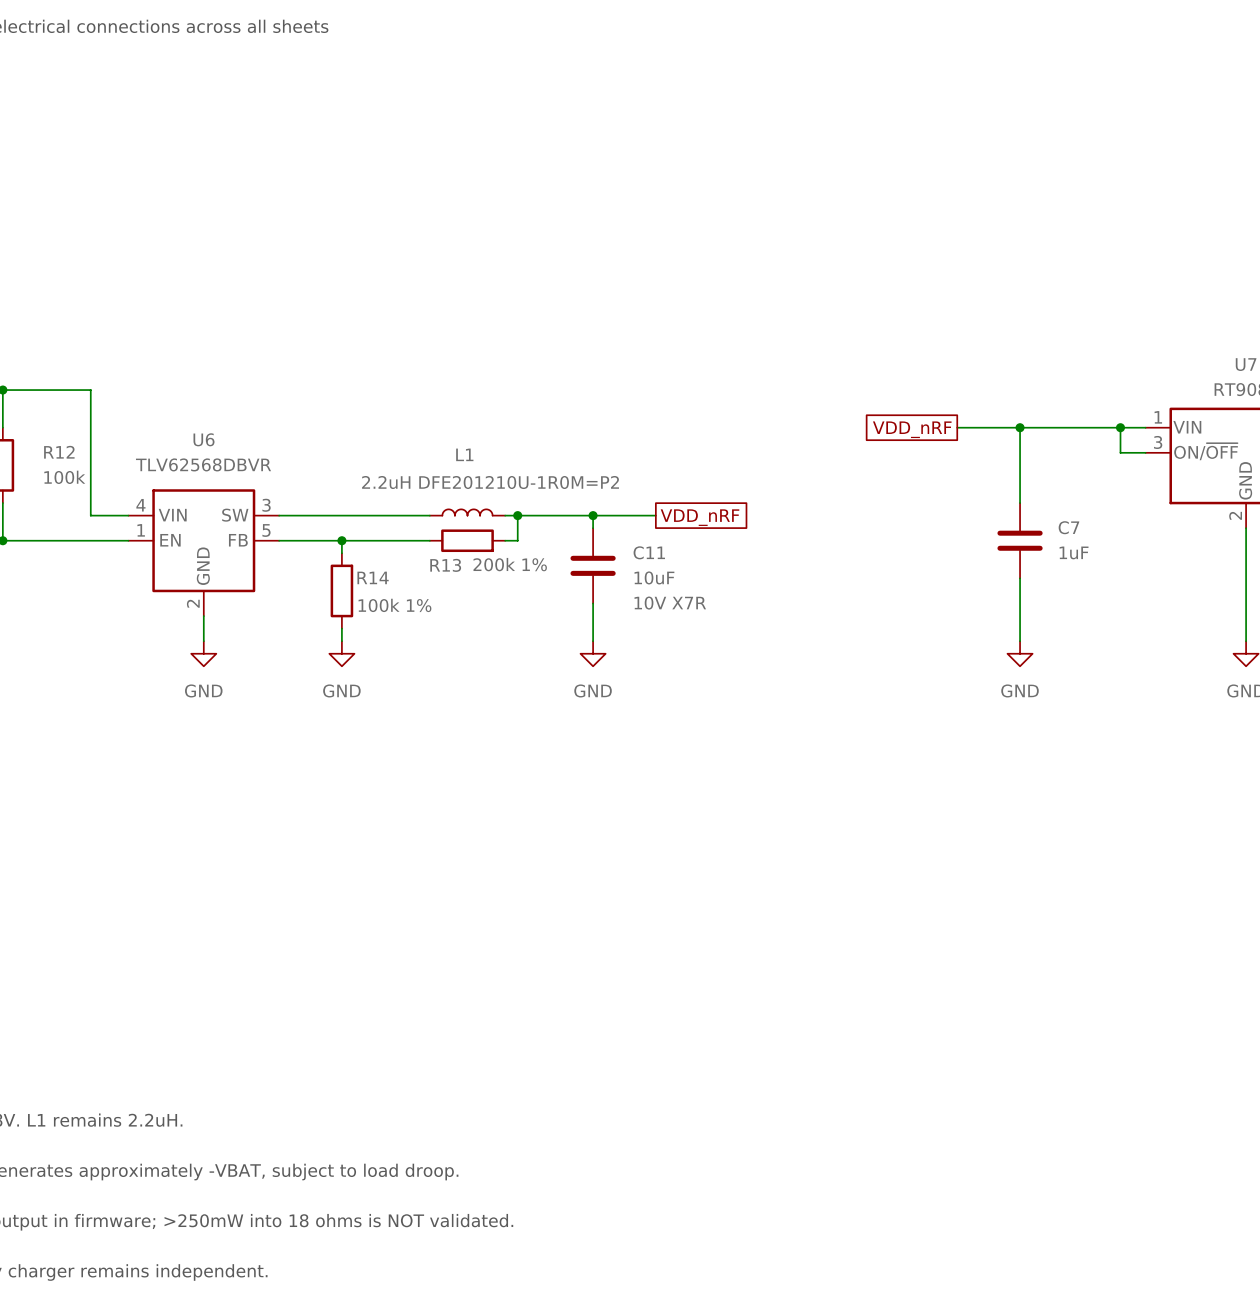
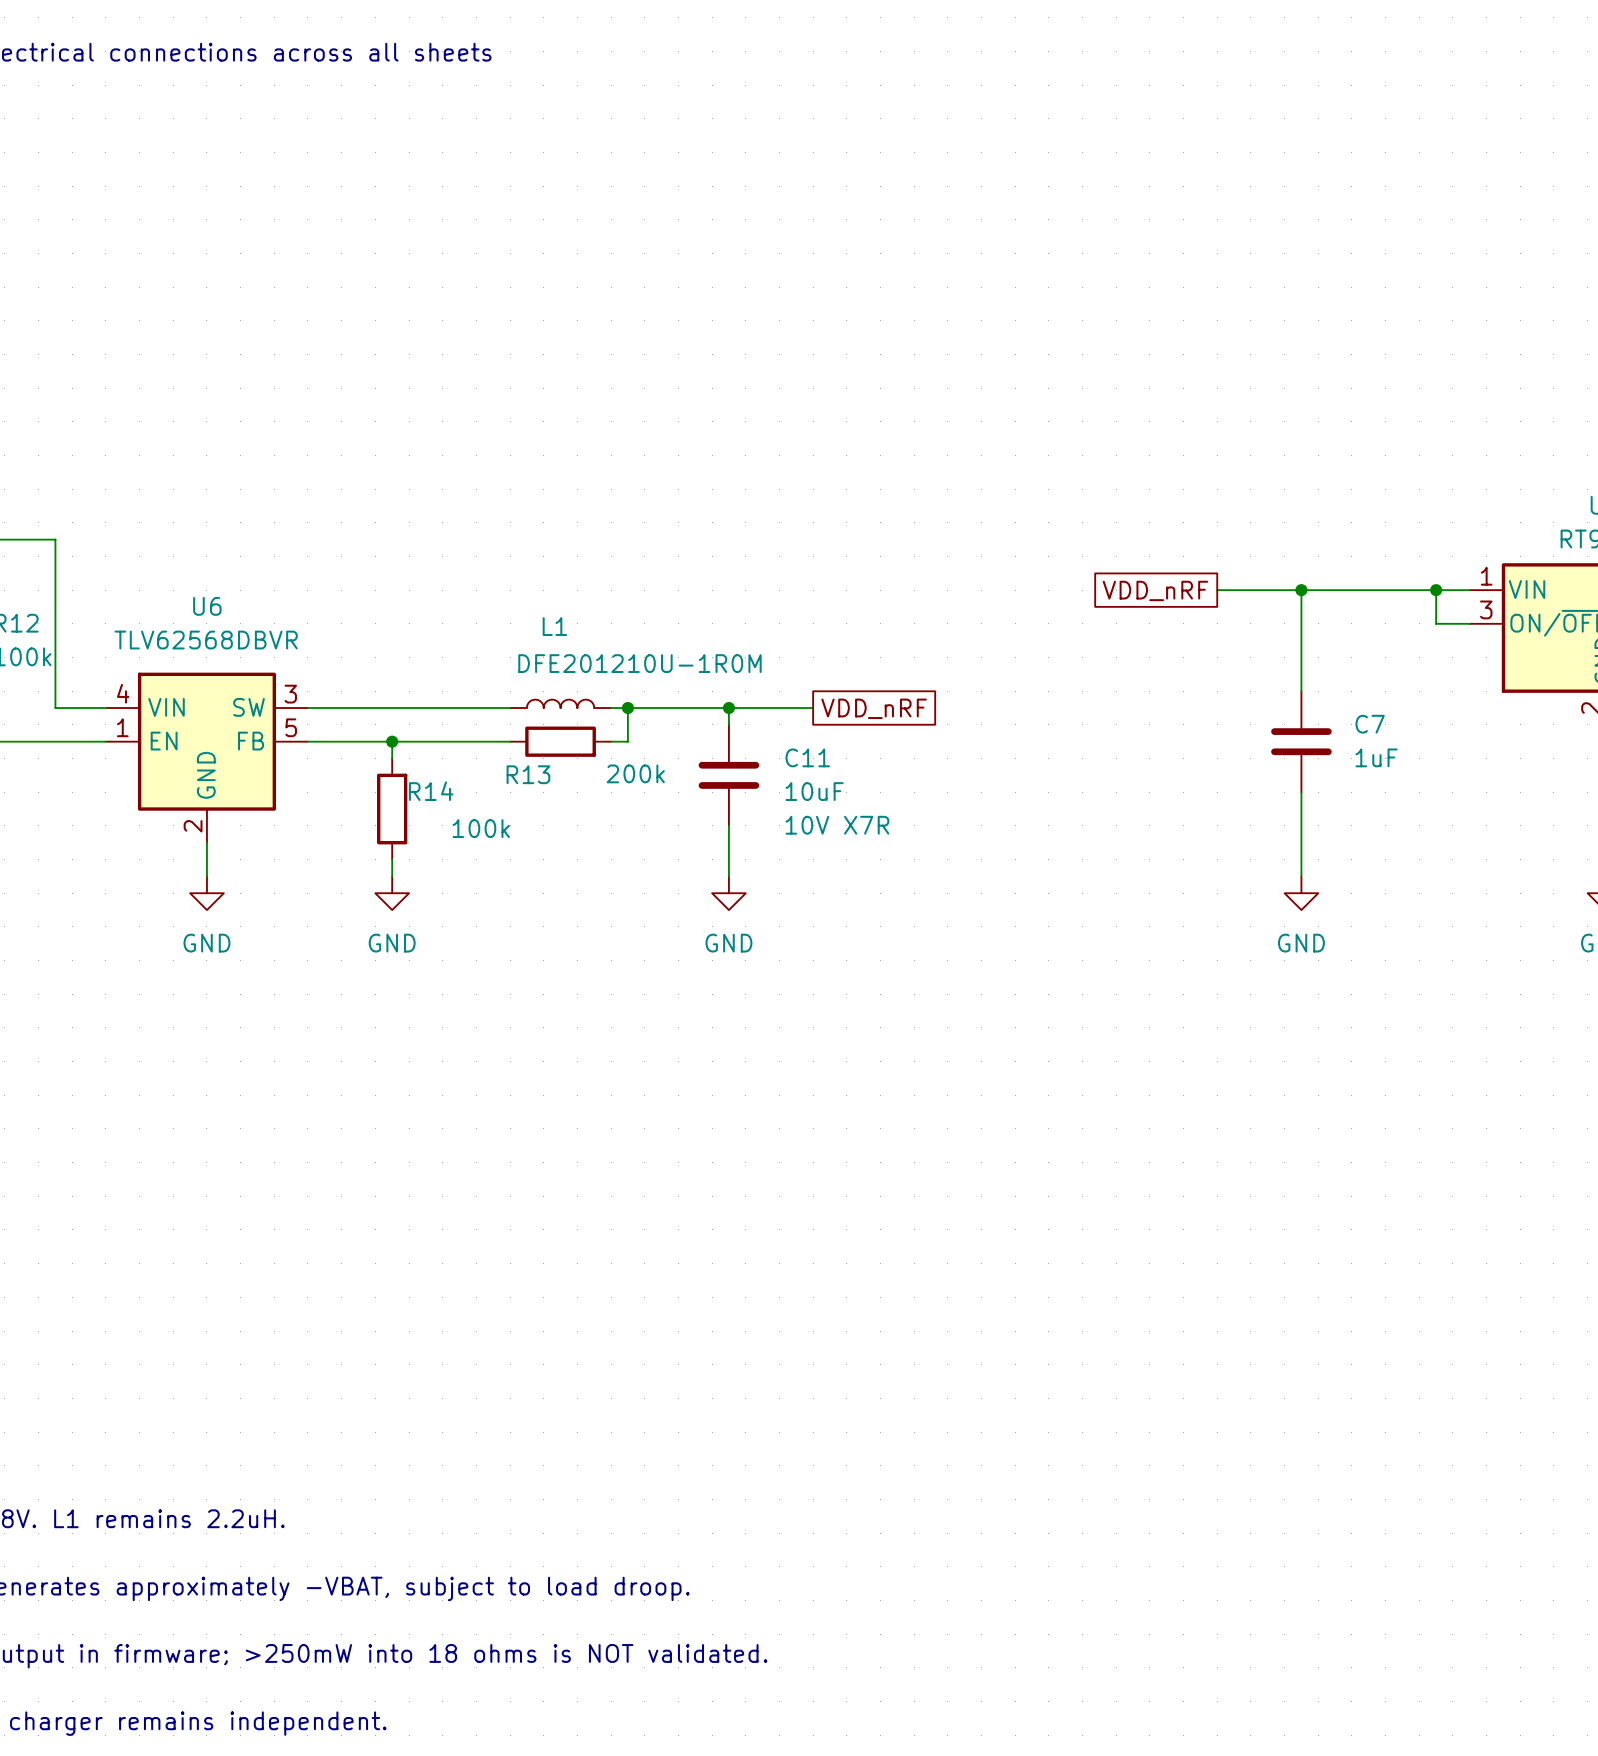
L1 value: 2.2uH DFE201210U-1R0M=P2 (490, 482) -> DFE201210U-1R0M (639, 663)
R13 value: 200k 1% (510, 564) -> 200k (635, 773)
R14 value: 100k 1% (394, 605) -> 100k (481, 828)

